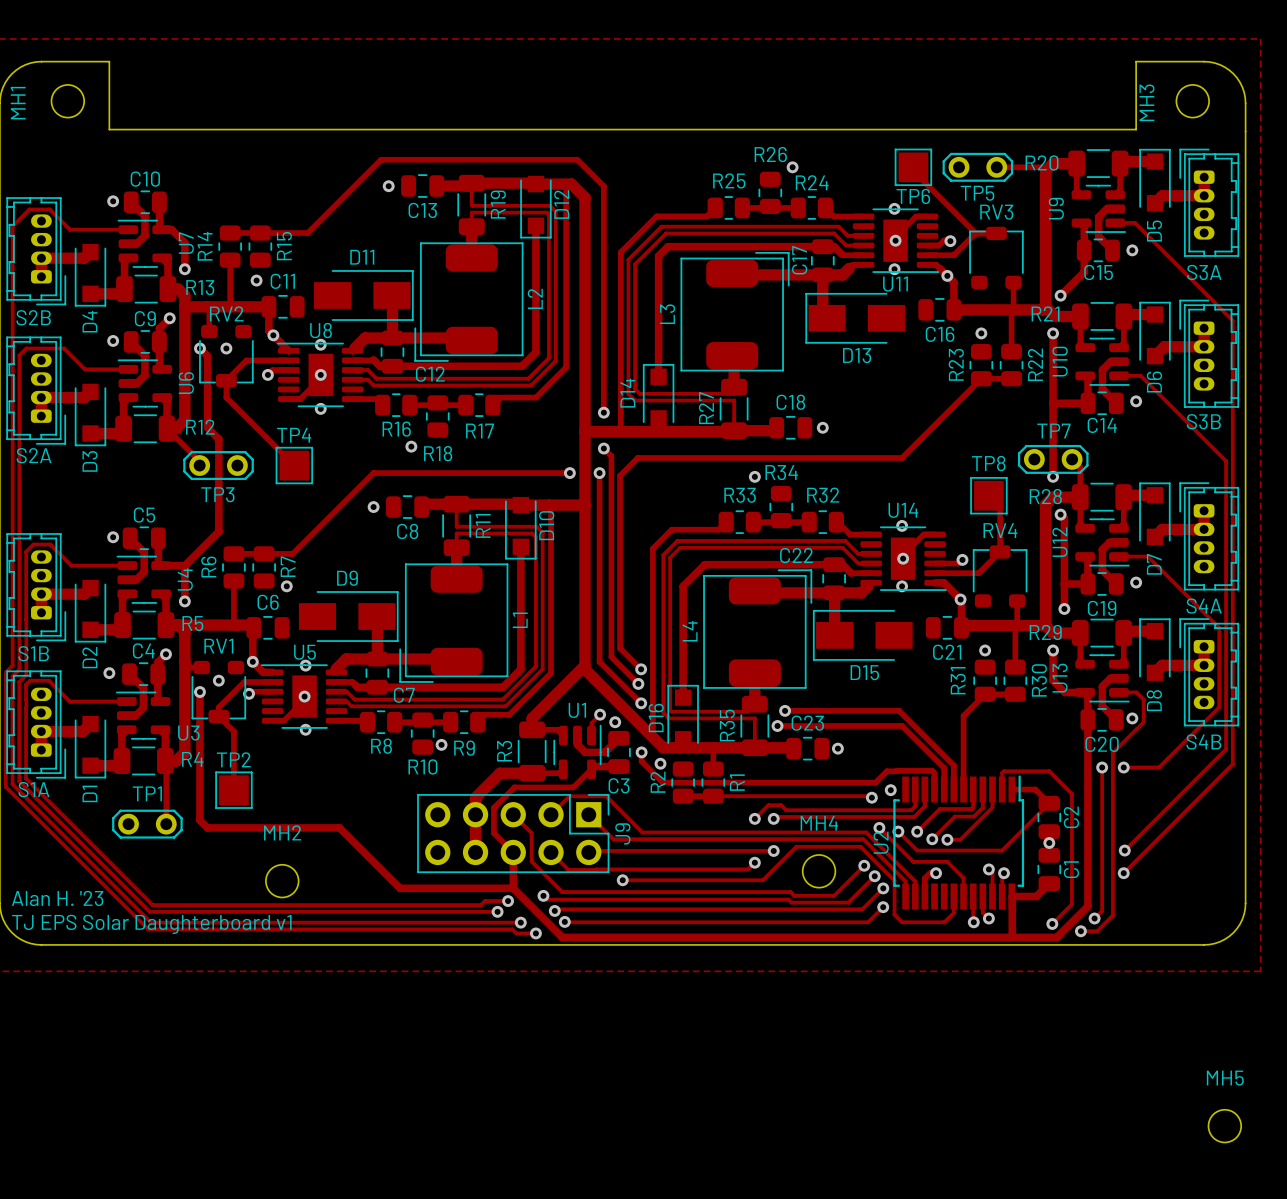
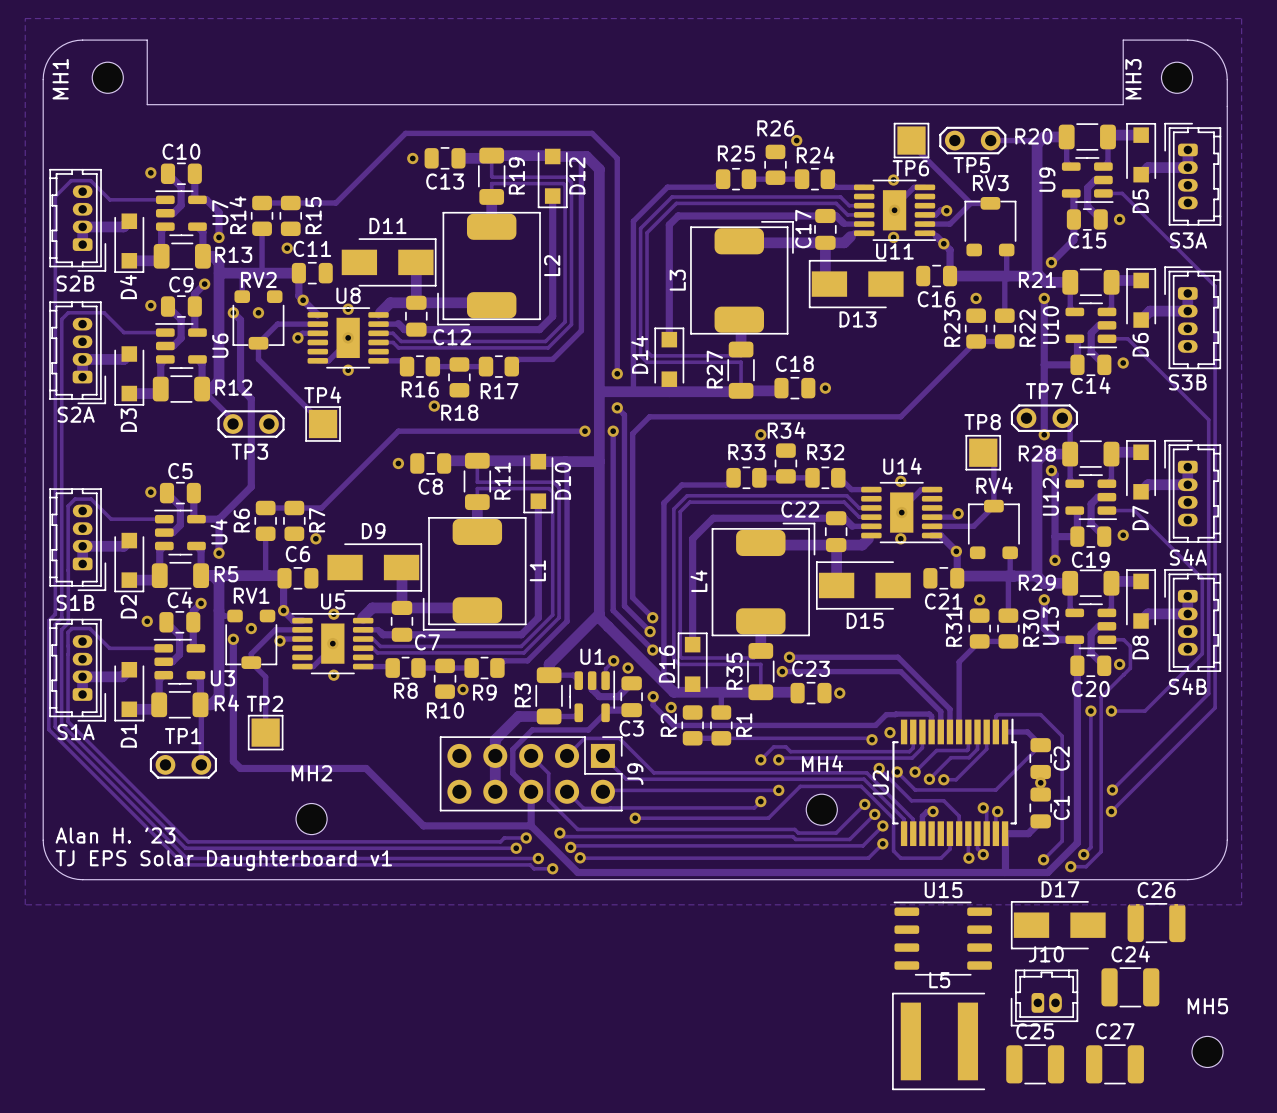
C26: none -> (1156, 923)
D17: none -> (1058, 925)
U15: none -> (942, 938)
C24: none -> (1130, 987)
J10: none -> (1044, 998)
L5: none -> (938, 1041)
C25: none -> (1035, 1064)
C27: none -> (1114, 1064)

